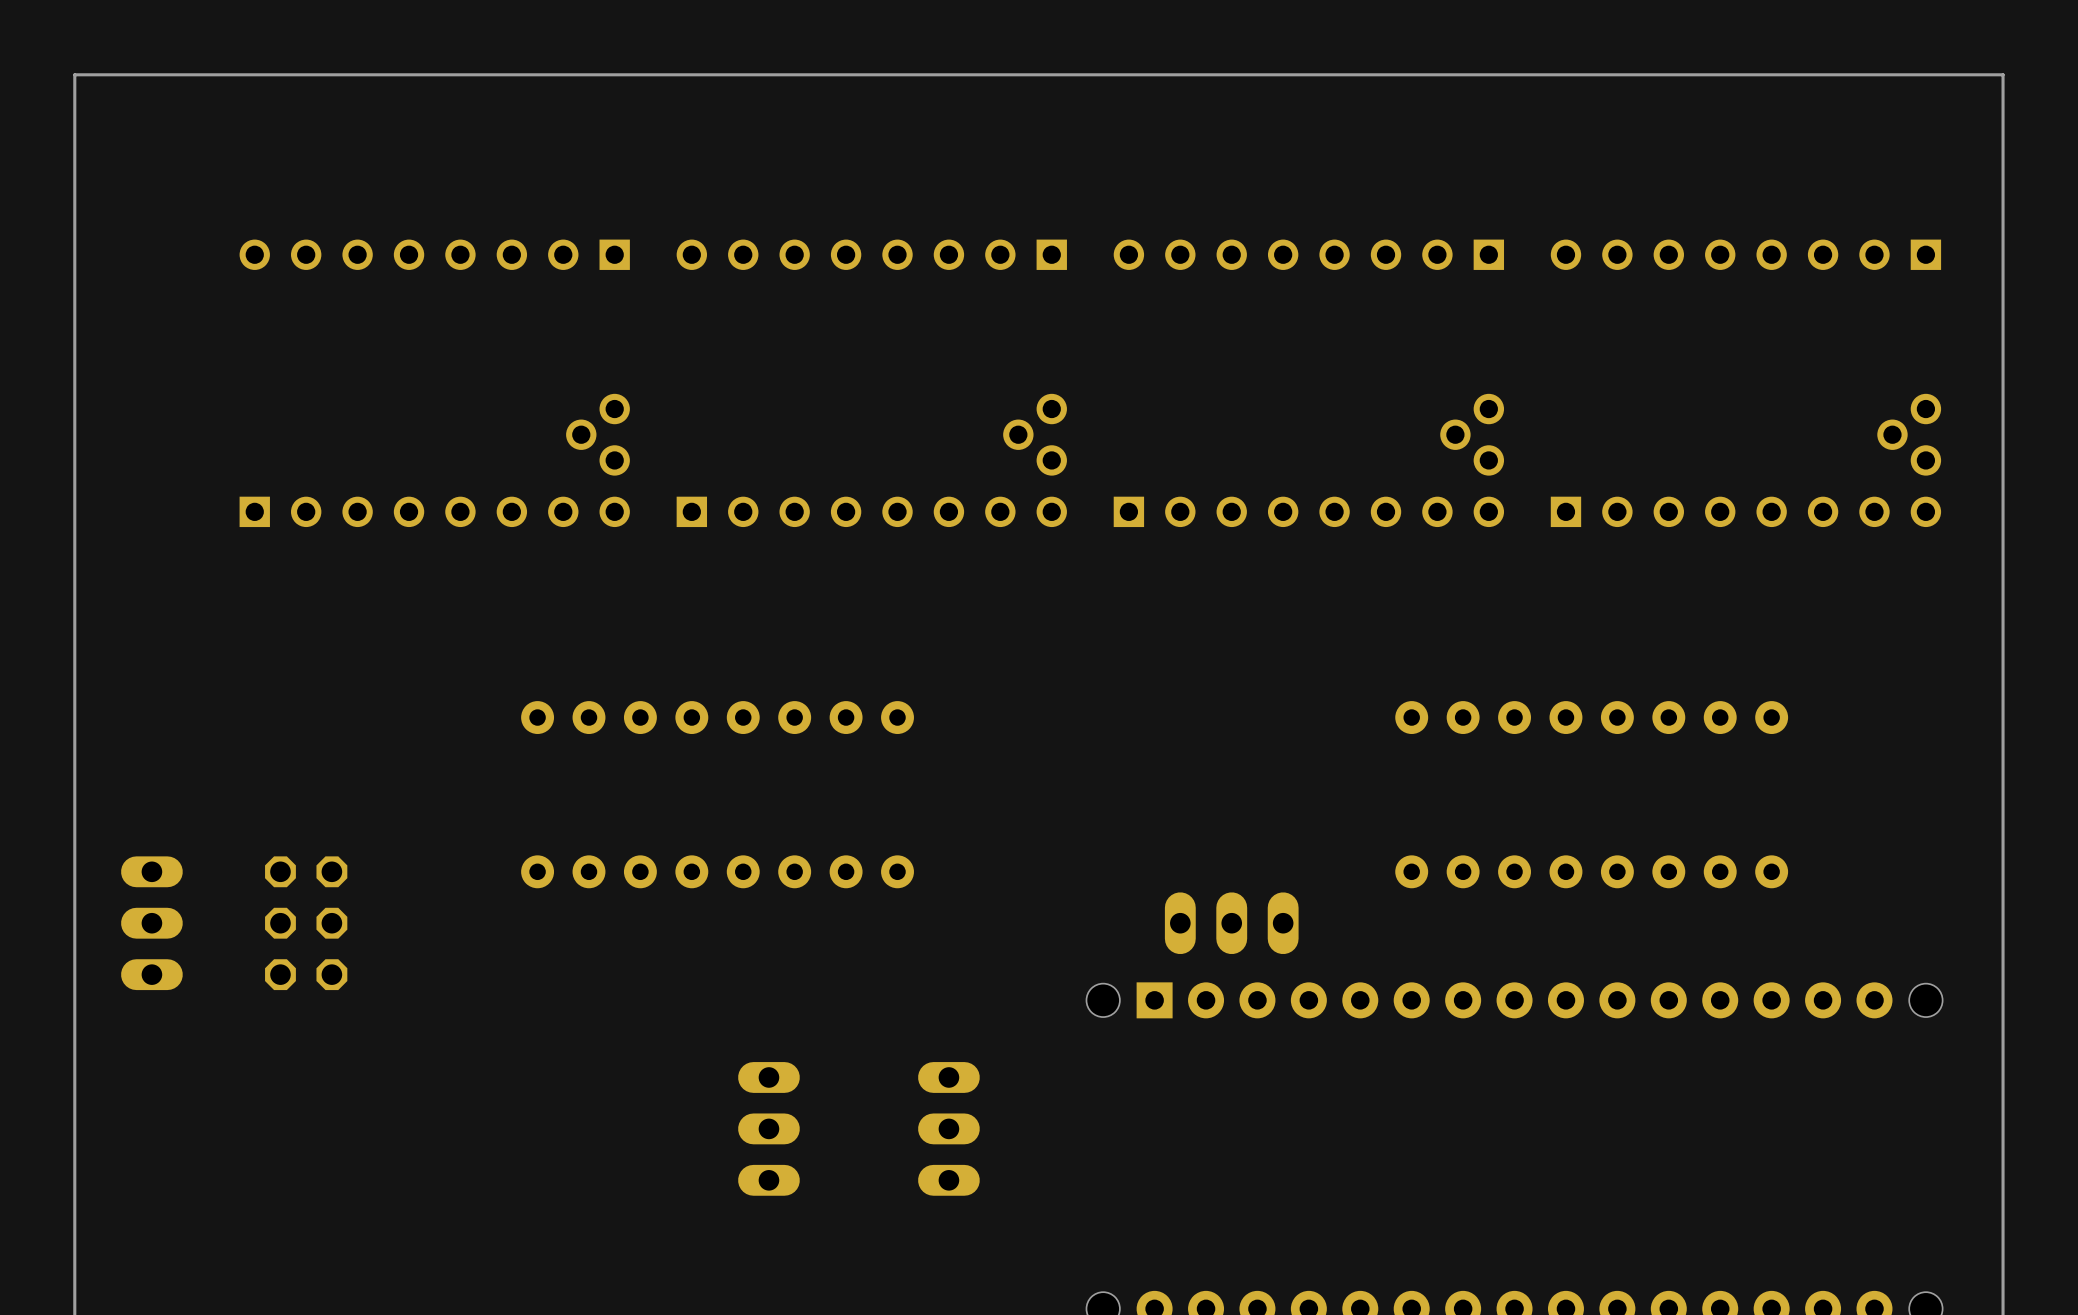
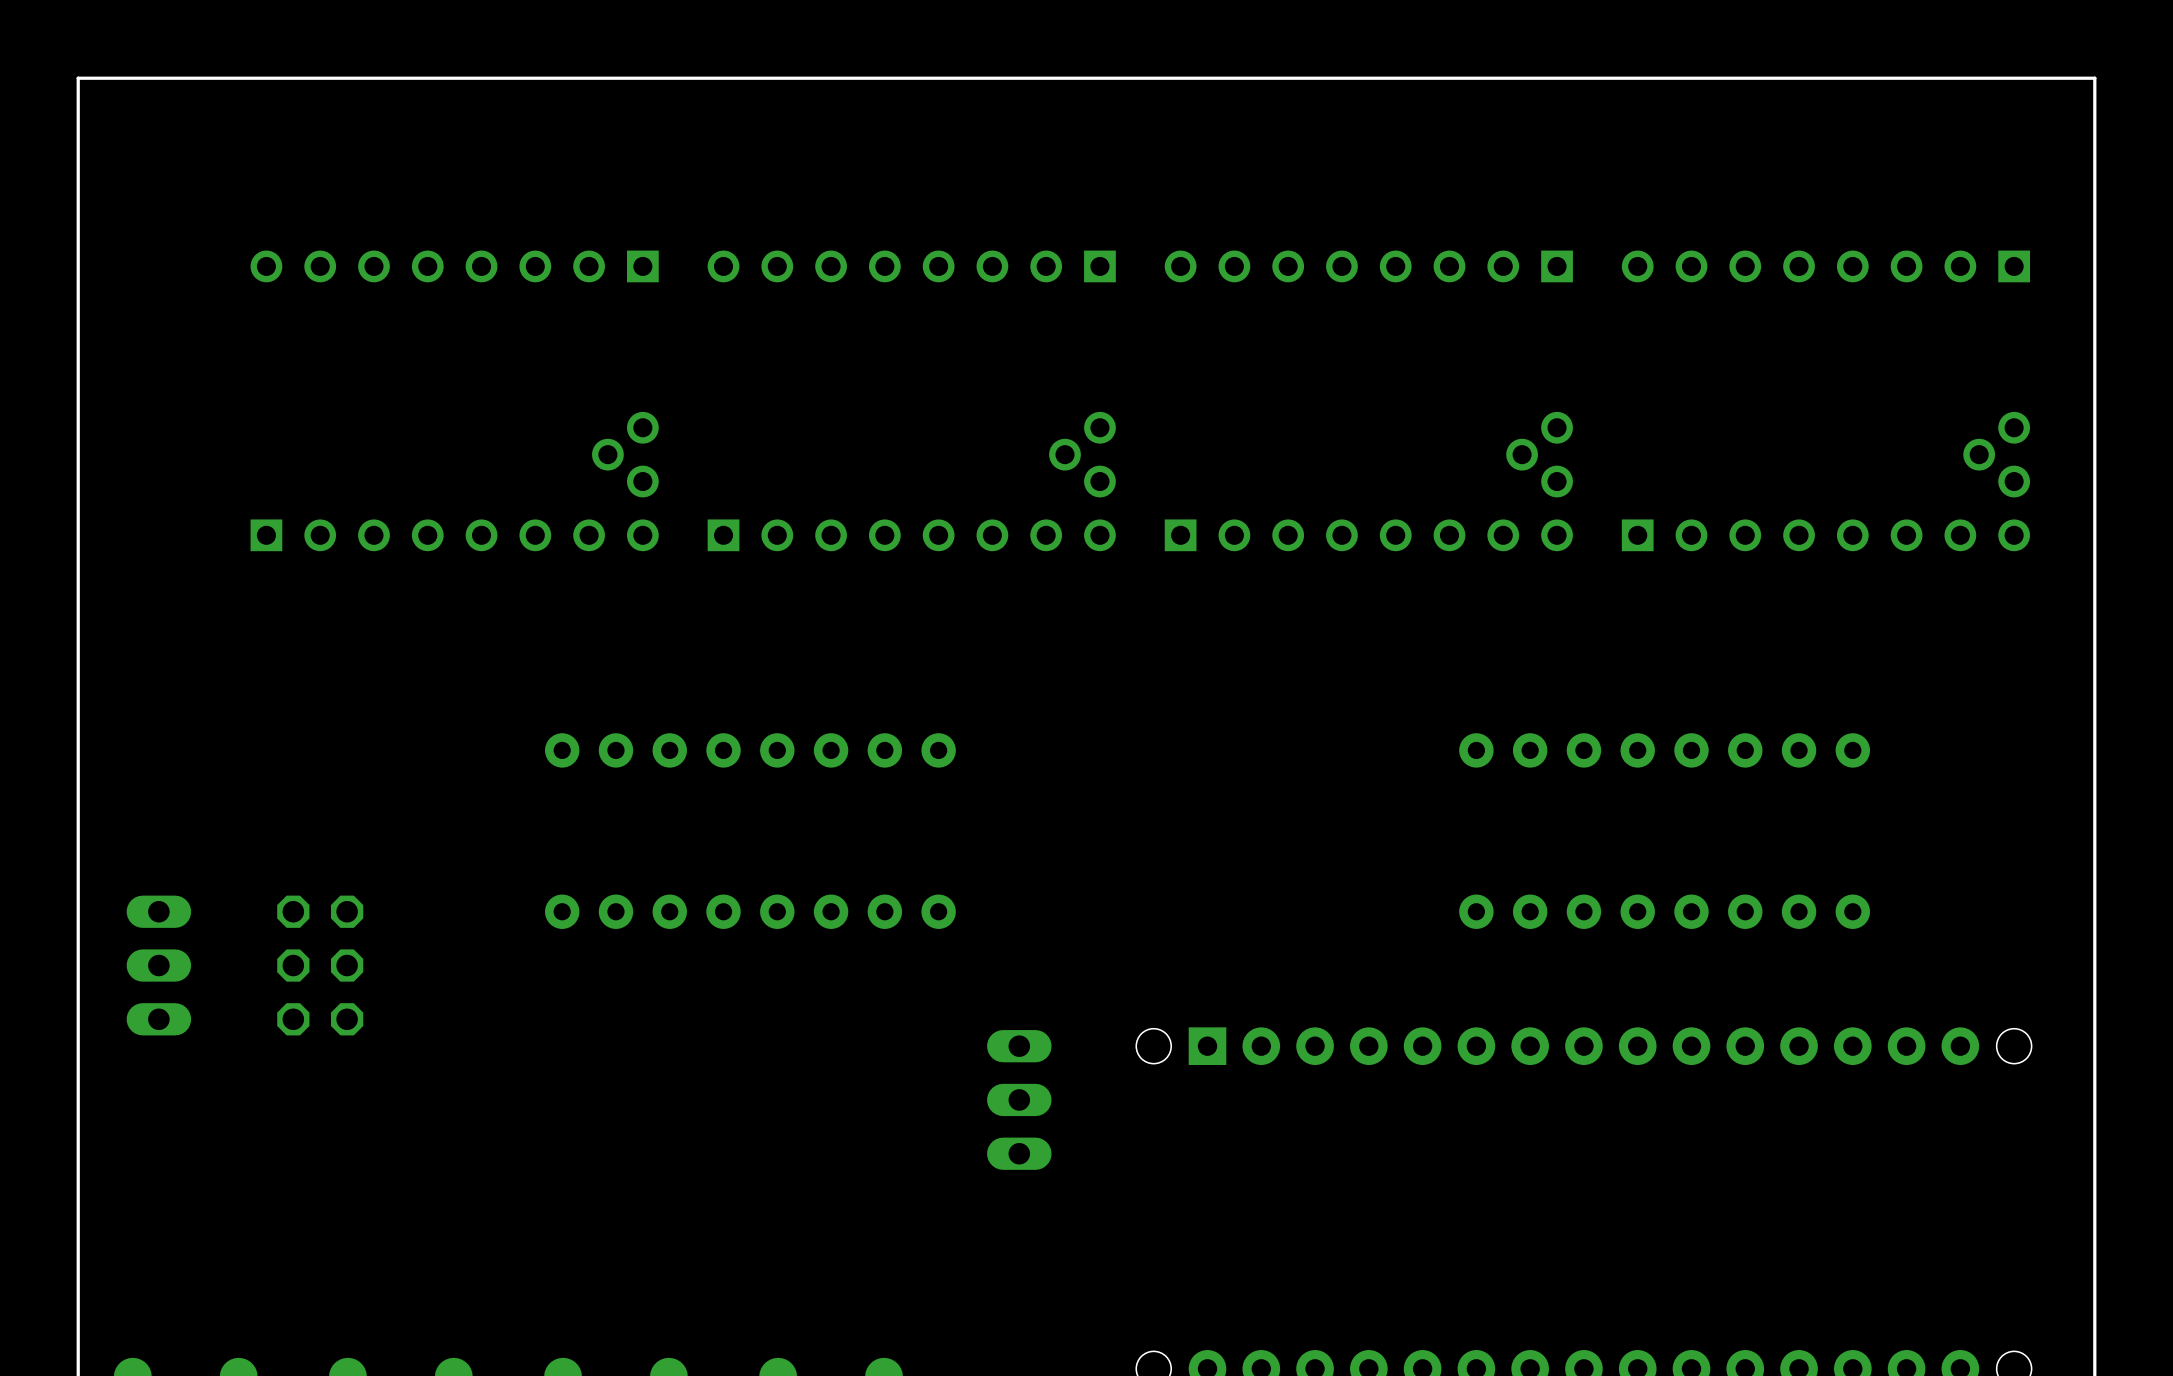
part: (1231, 923) -> none
part: (768, 1128) -> none
part position: (948, 1128) -> (1019, 1099)

